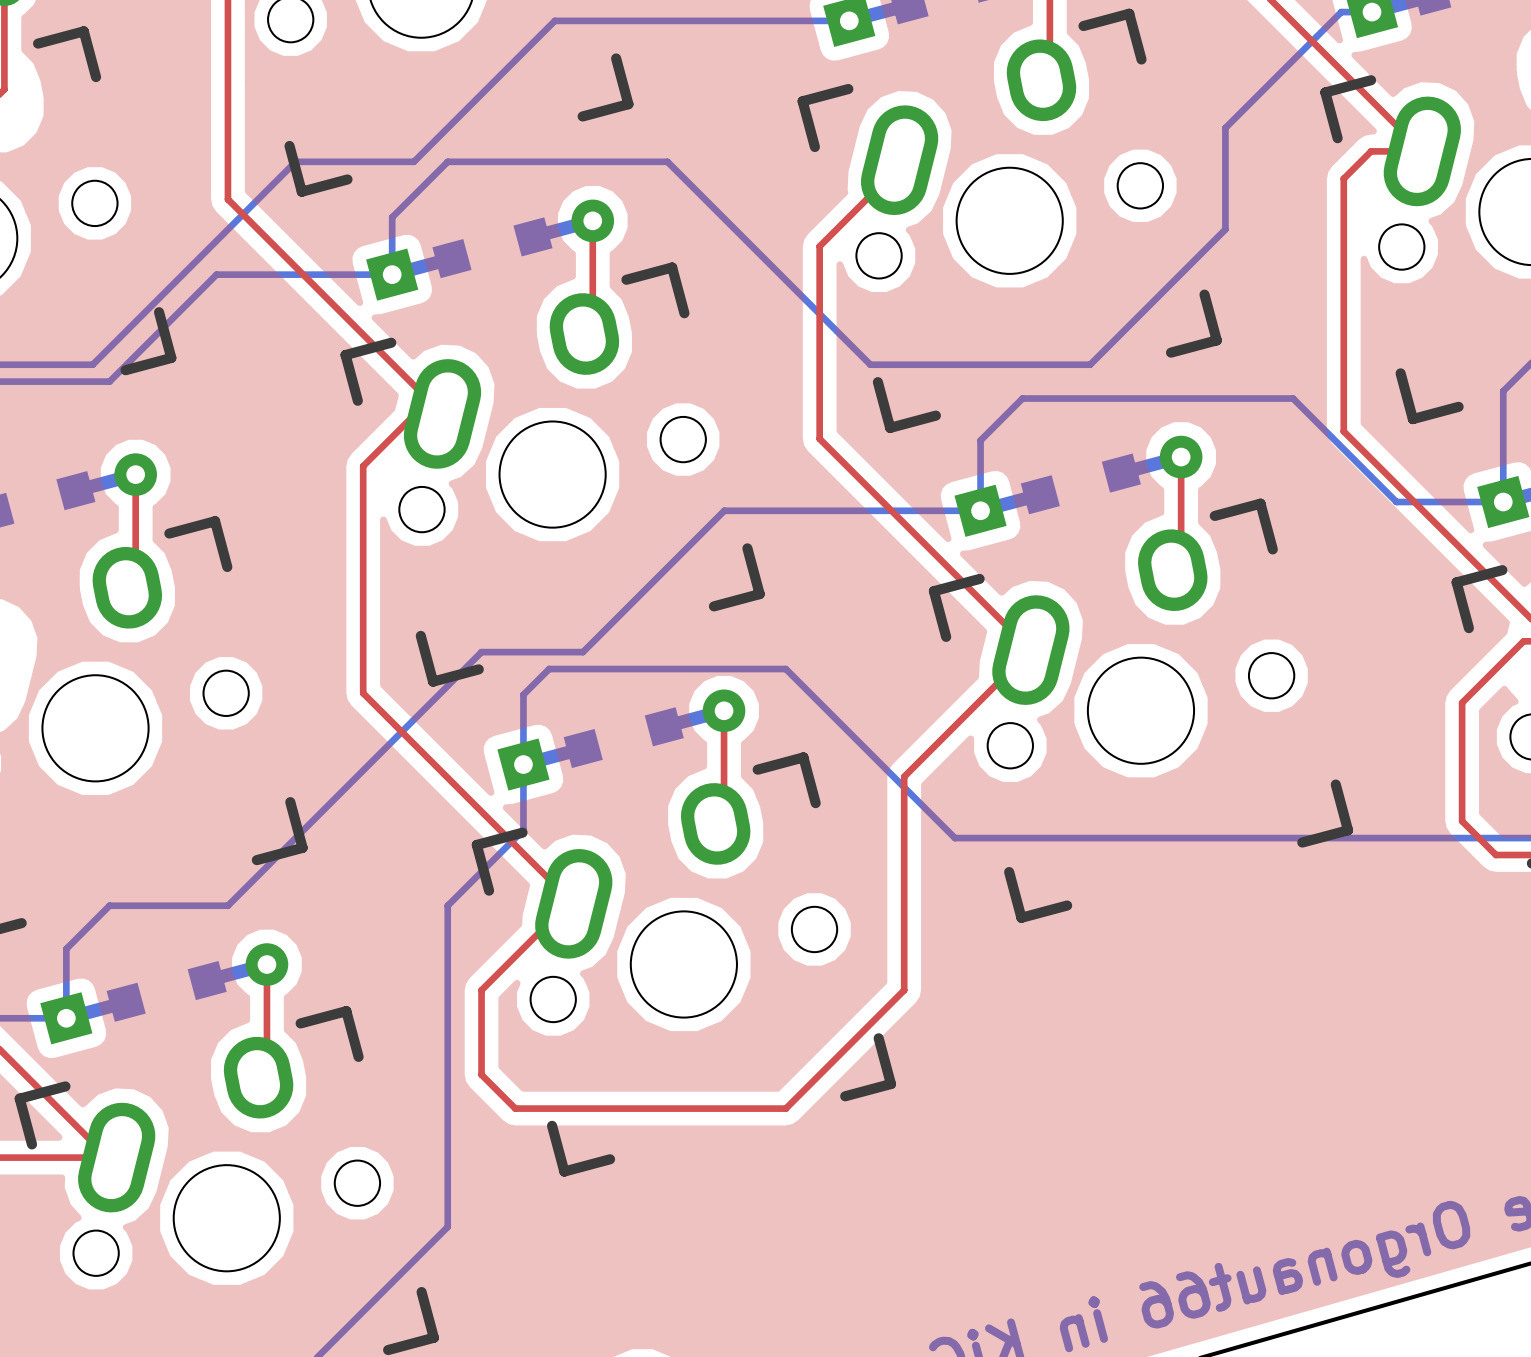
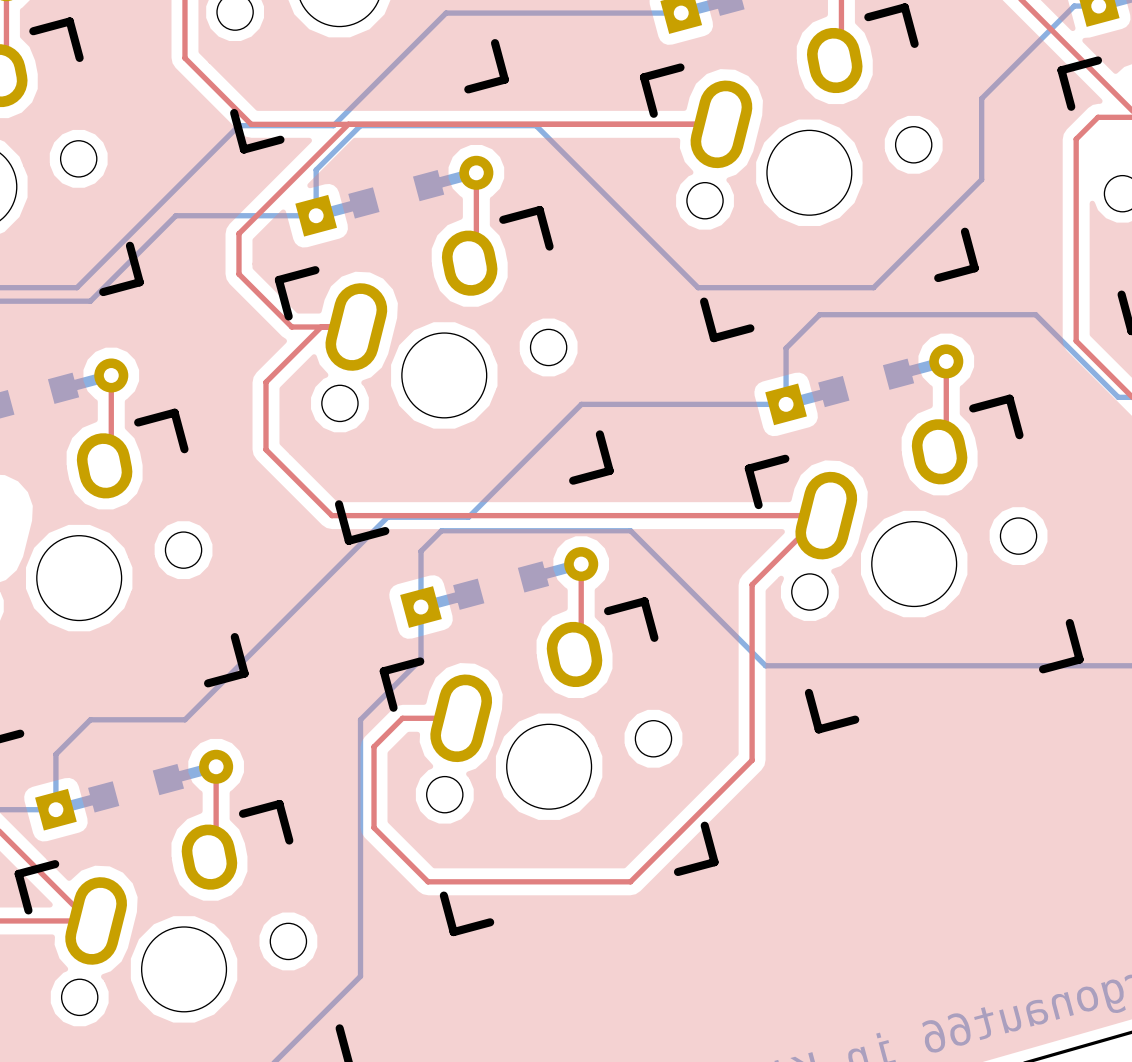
top track: (227, 77) (227, 199) (442, 413) -> (184, 58) (251, 124) (712, 124)
top track: (899, 160) (899, 166) (819, 246) (819, 438) (1030, 650) (904, 776) (904, 990) -> (821, 515) (752, 584) (752, 760) (725, 787)
top track: none -> (321, 327) (266, 382) (266, 449) (331, 515) (807, 515)
top track: (415, 413) (363, 466) (363, 693) (573, 903) -> (334, 327) (291, 327) (238, 274) (238, 233) (348, 124)
top track: (567, 903) (481, 990) (481, 1074) (515, 1108) (532, 1108) -> (456, 718) (402, 718) (374, 746) (374, 827) (428, 881)

